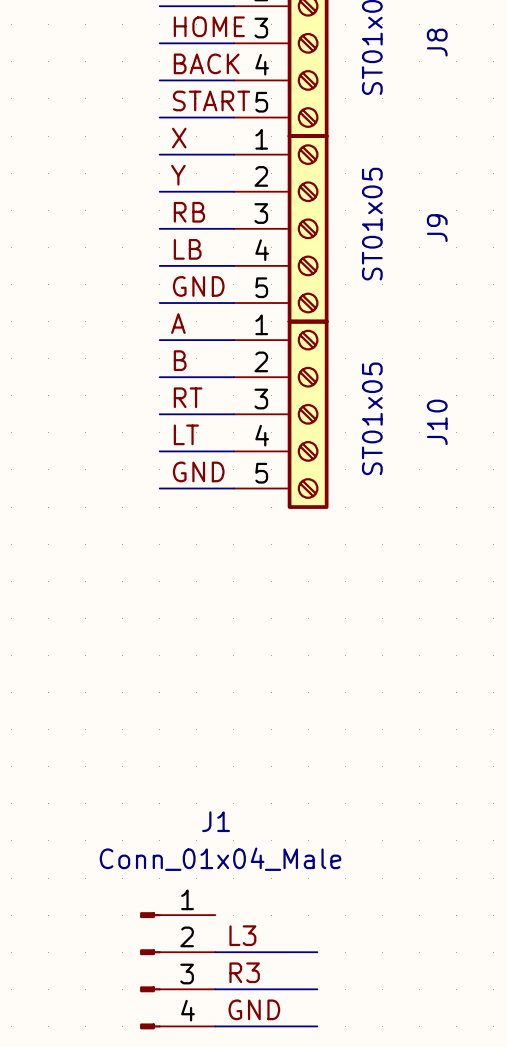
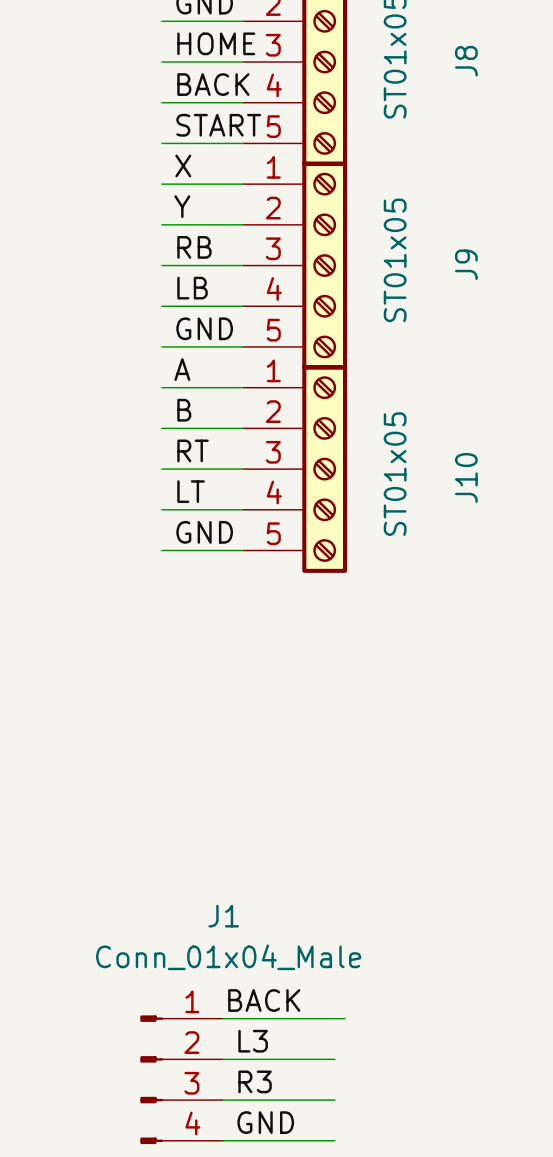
label: none -> BACK (264, 1000)
wire: none -> (222, 1018) (345, 1018)

